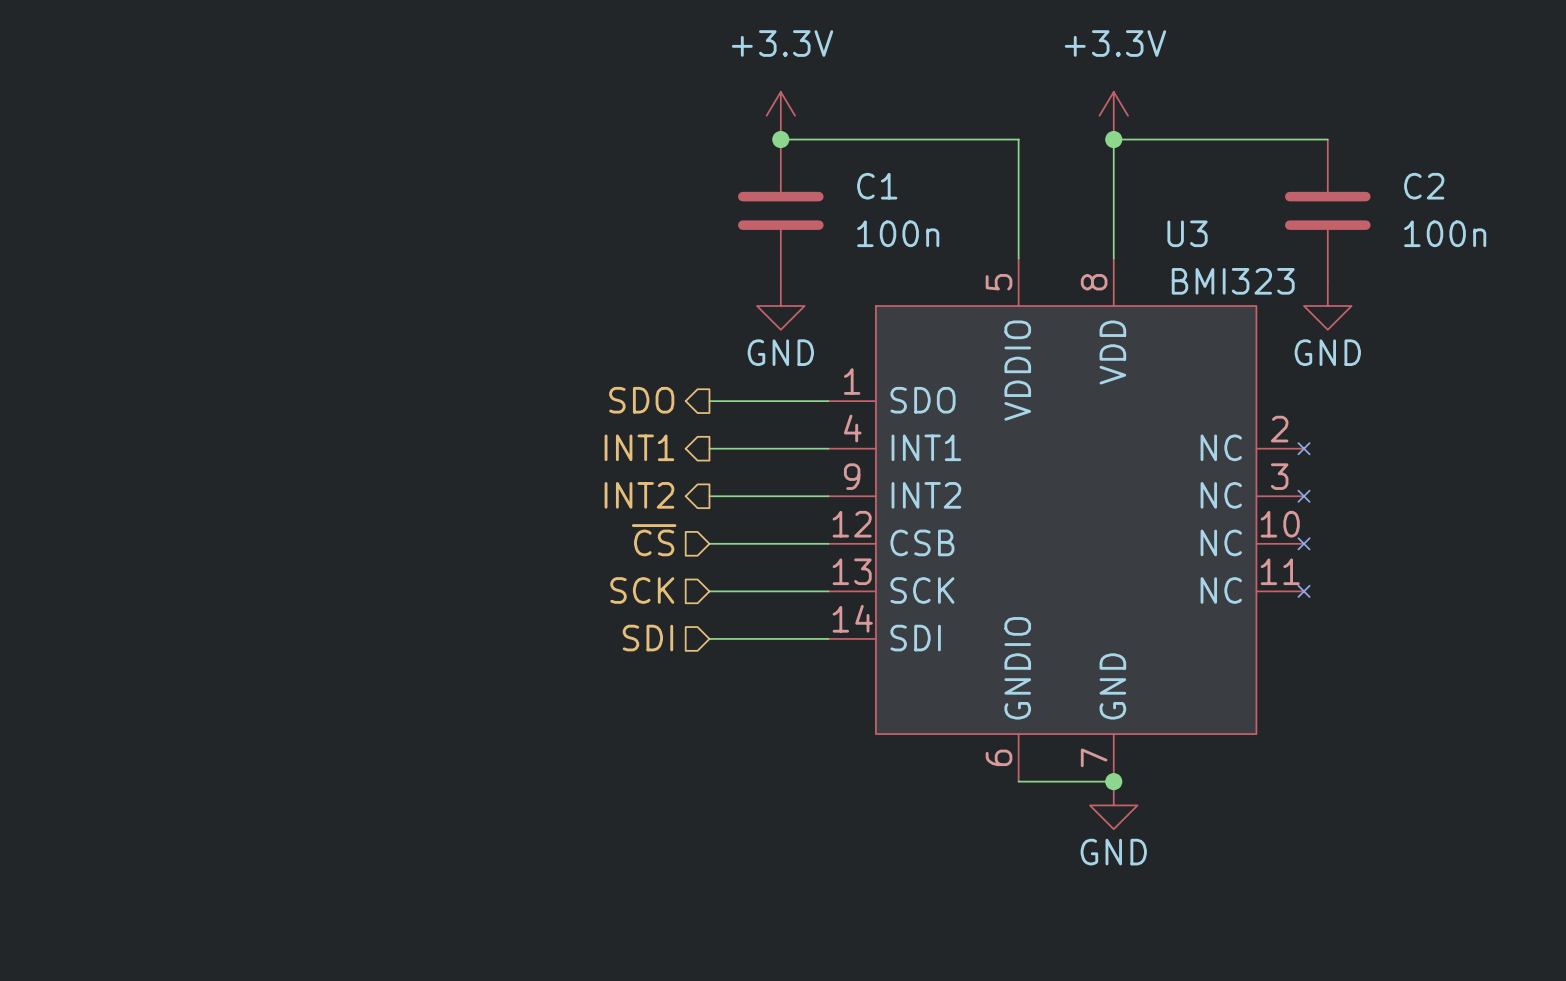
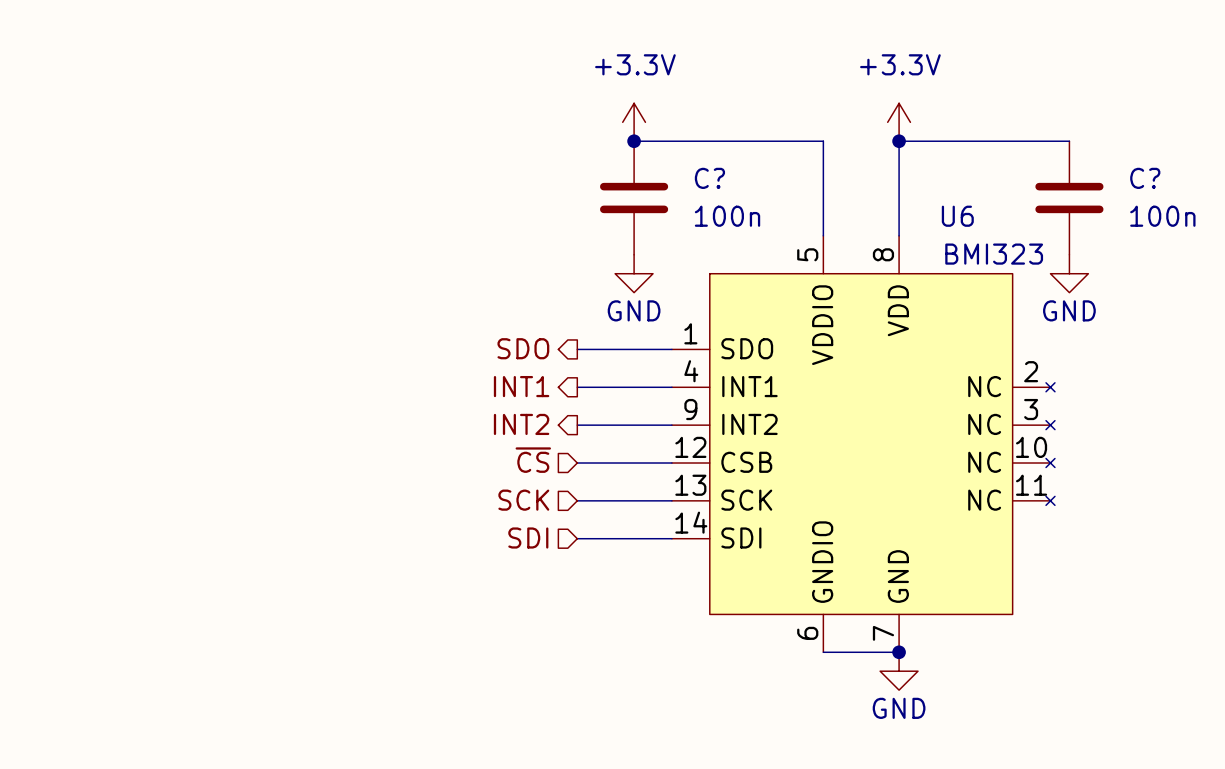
C1 name: C1 (877, 186) -> C? (709, 178)
C2 name: C2 (1424, 186) -> C? (1145, 178)
U3 name: U3 (1187, 233) -> U6 (957, 216)

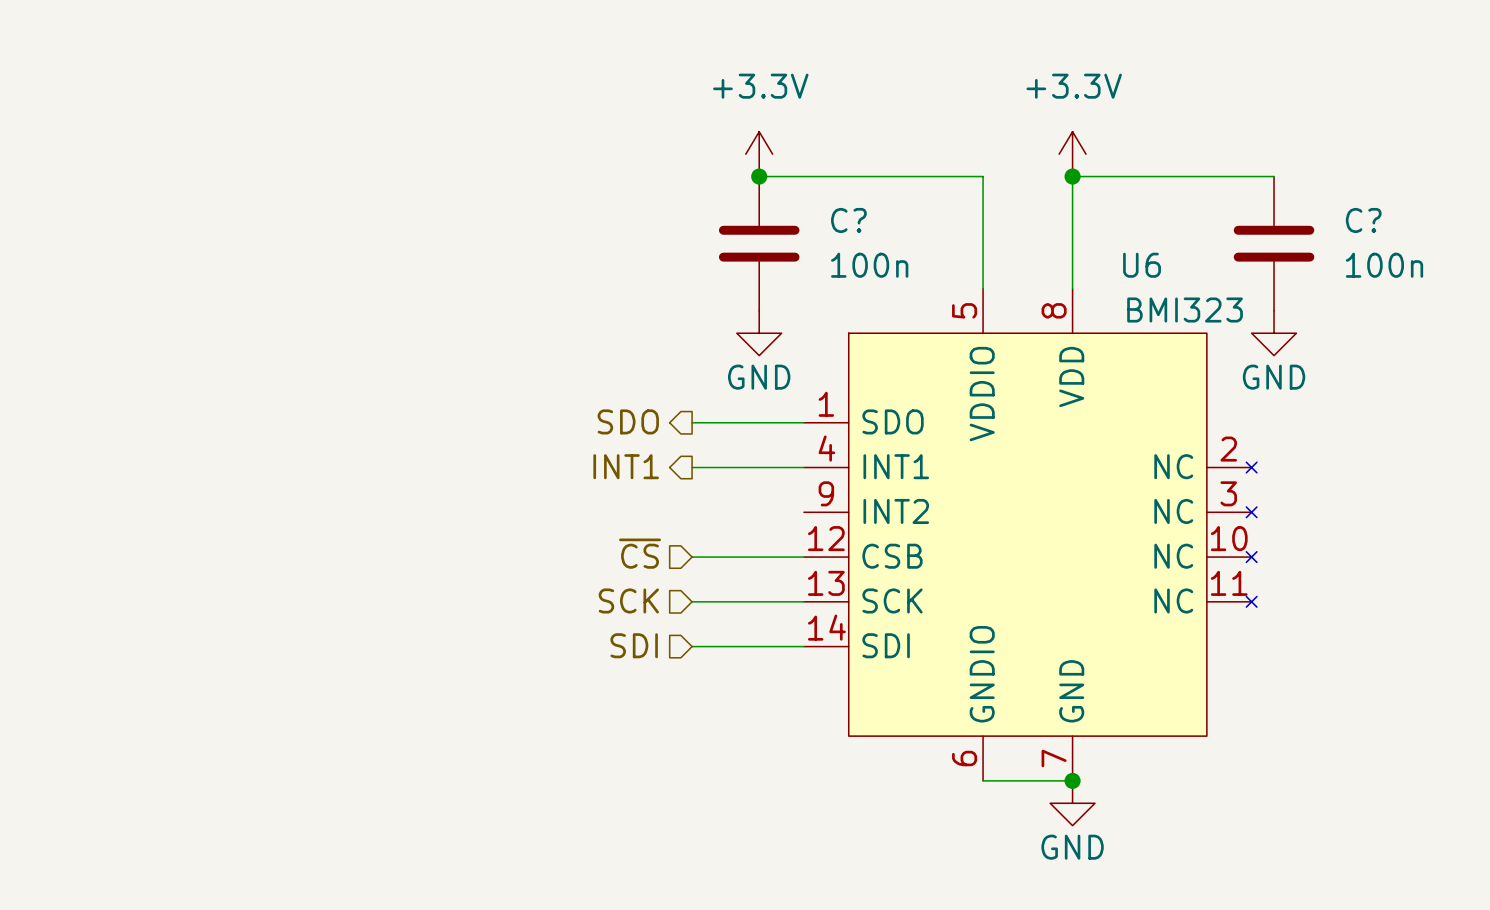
hierarchical label: INT2 (521, 424) -> none
wire: (577, 425) (671, 425) -> none

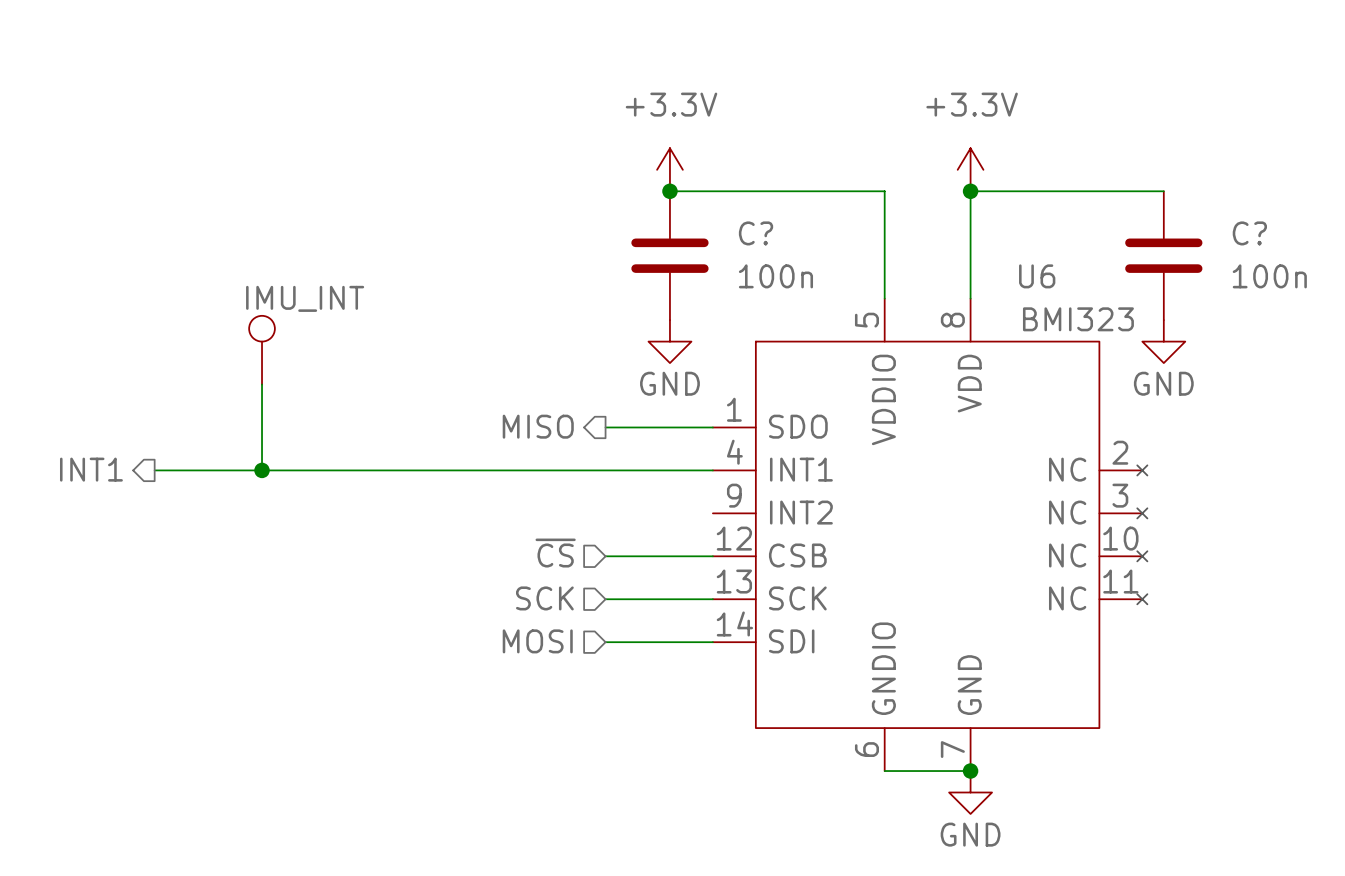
part: none -> IMU_INT (262, 350)
wire: none -> (262, 384) (262, 470)
hierarchical label: SDO (628, 421) -> MISO (538, 426)
hierarchical label: none -> INT1 (91, 469)
hierarchical label: INT1 (626, 466) -> none
wire: none -> (154, 470) (605, 470)
junction: none -> (262, 470)
hierarchical label: SDI (634, 645) -> MOSI (537, 641)

